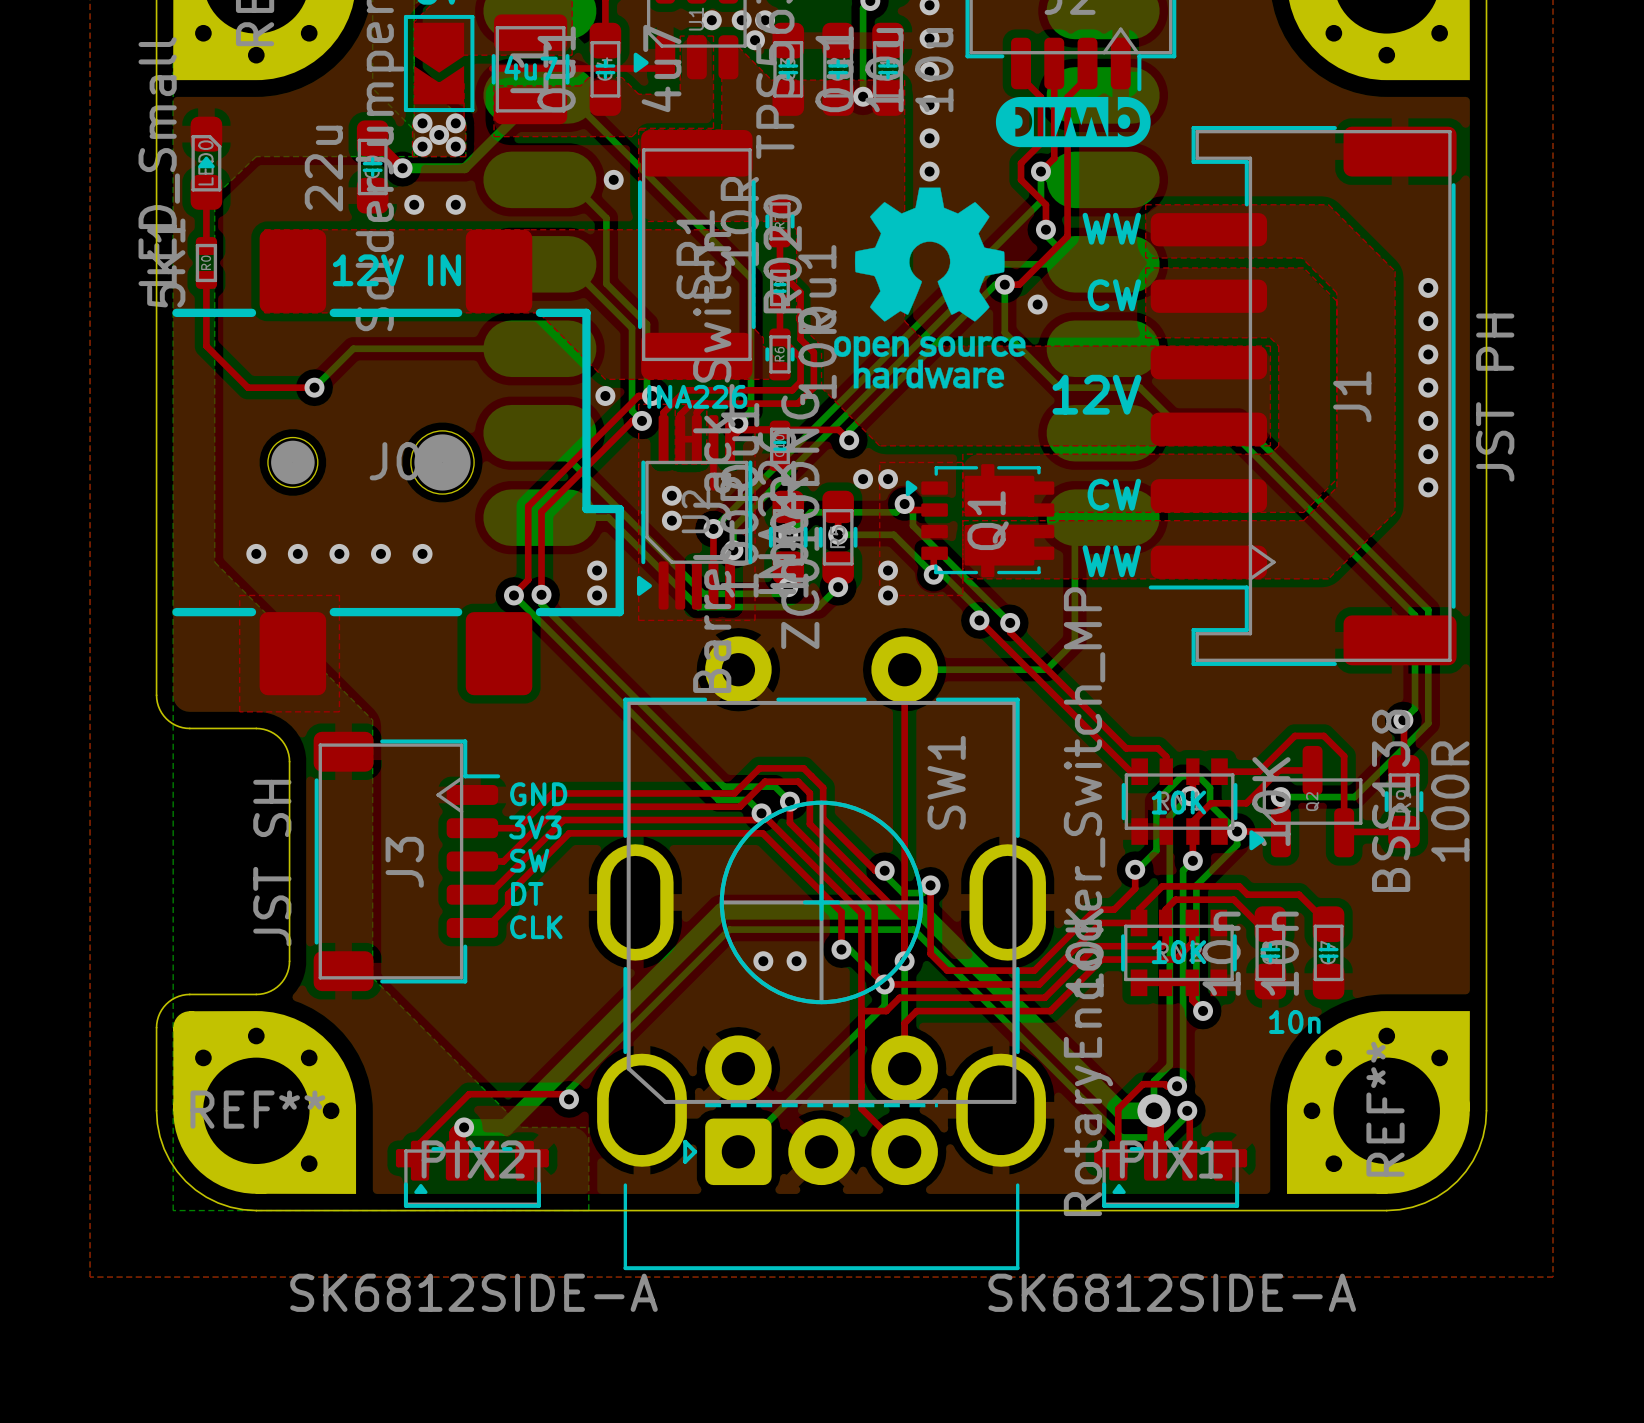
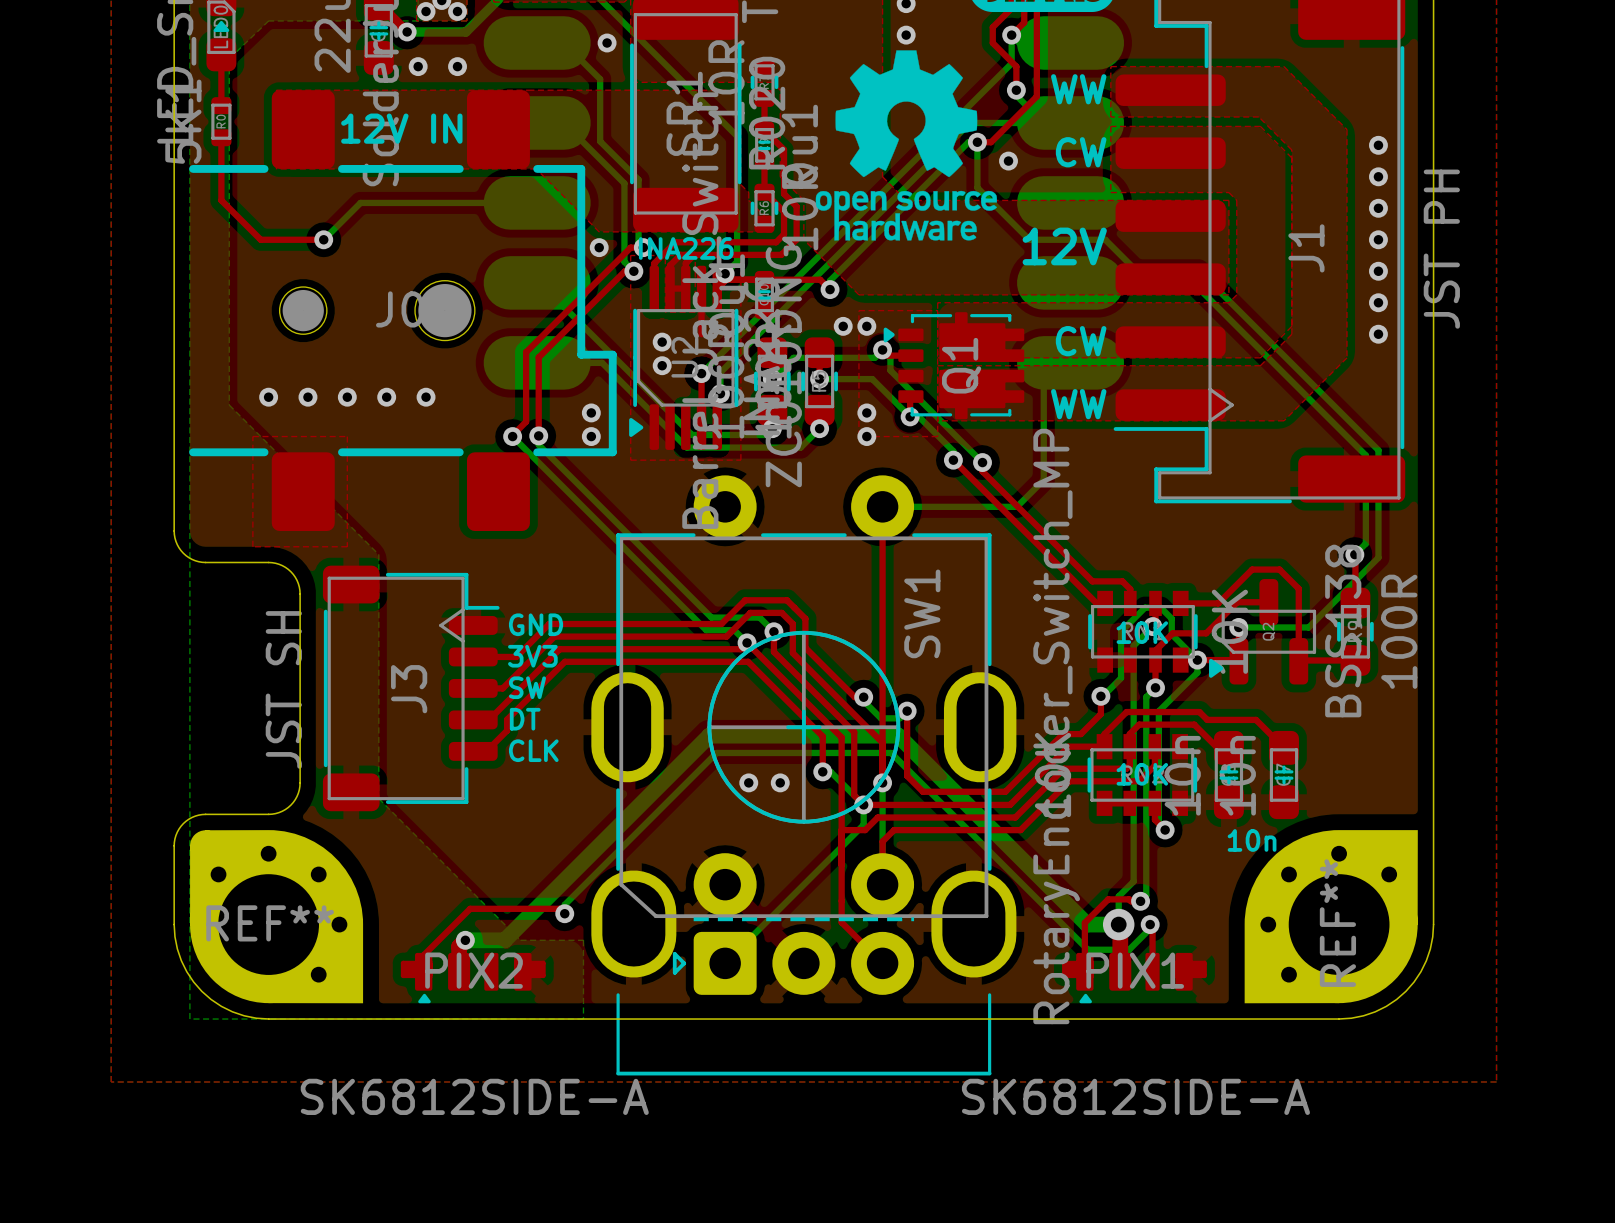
PIX2 footprint: [395, 1140, 549, 1208] -> [400, 952, 546, 1004]
PIX1 footprint: [1094, 1140, 1248, 1208] -> [1062, 952, 1207, 1004]

